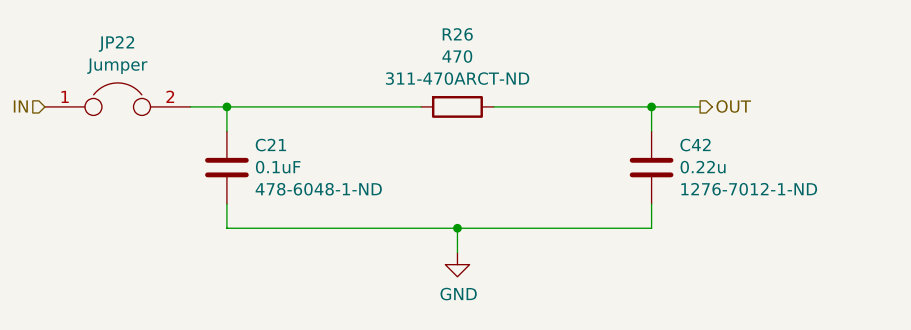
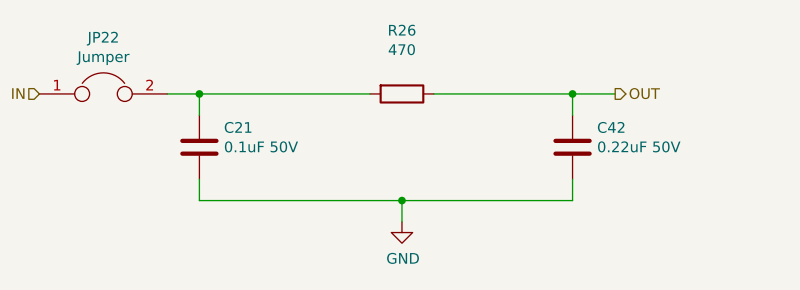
R26 text: 311-470ARCT-ND (457, 78) -> none
C21 value: 0.1uF (278, 167) -> 0.1uF 50V (261, 146)
C42 value: 0.22u (703, 167) -> 0.22uF 50V (639, 146)
C21 text: 478-6048-1-ND (318, 189) -> none
C42 text: 1276-7012-1-ND (749, 189) -> none

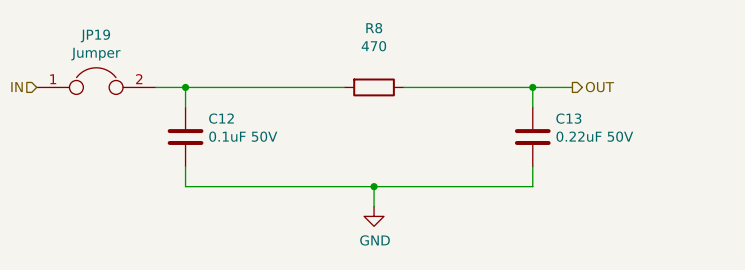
R26 name: R26 (402, 30) -> R8 (374, 28)
JP22 name: JP22 (102, 38) -> JP19 (95, 35)
C21 name: C21 (238, 127) -> C12 (221, 118)
C42 name: C42 (611, 127) -> C13 (568, 118)

